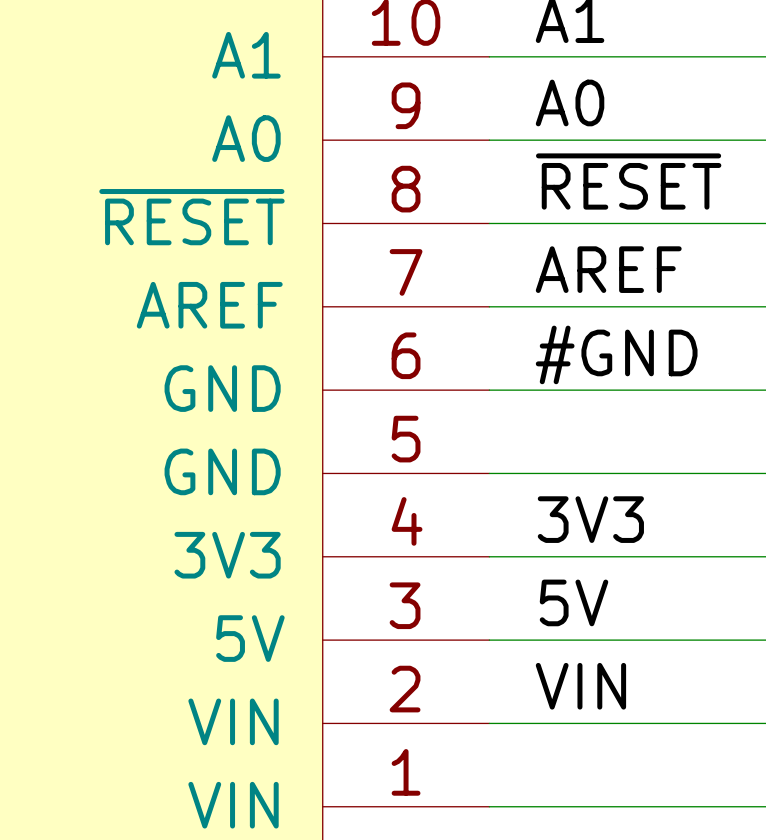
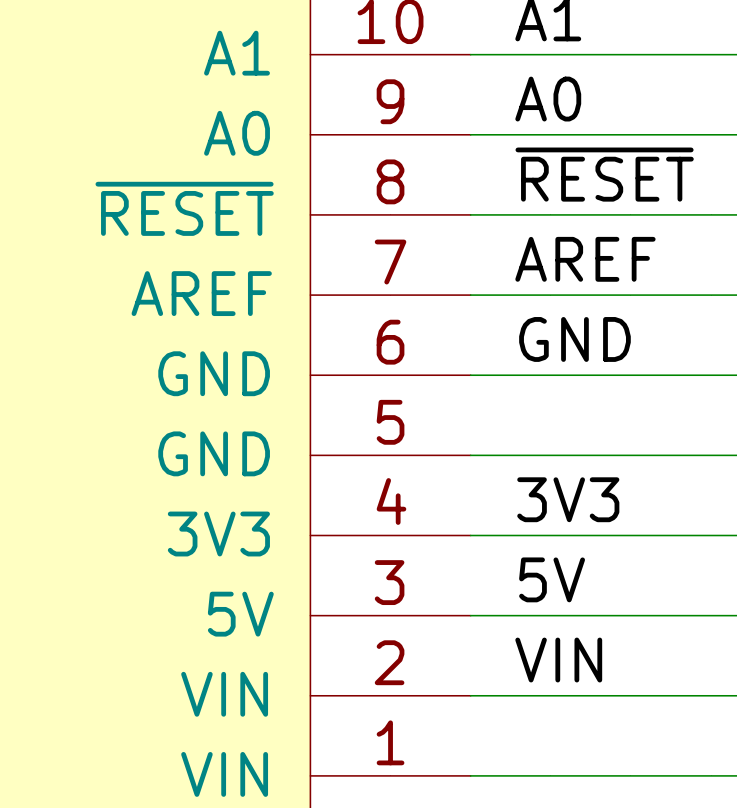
label: #GND (616, 354) -> GND (574, 339)

